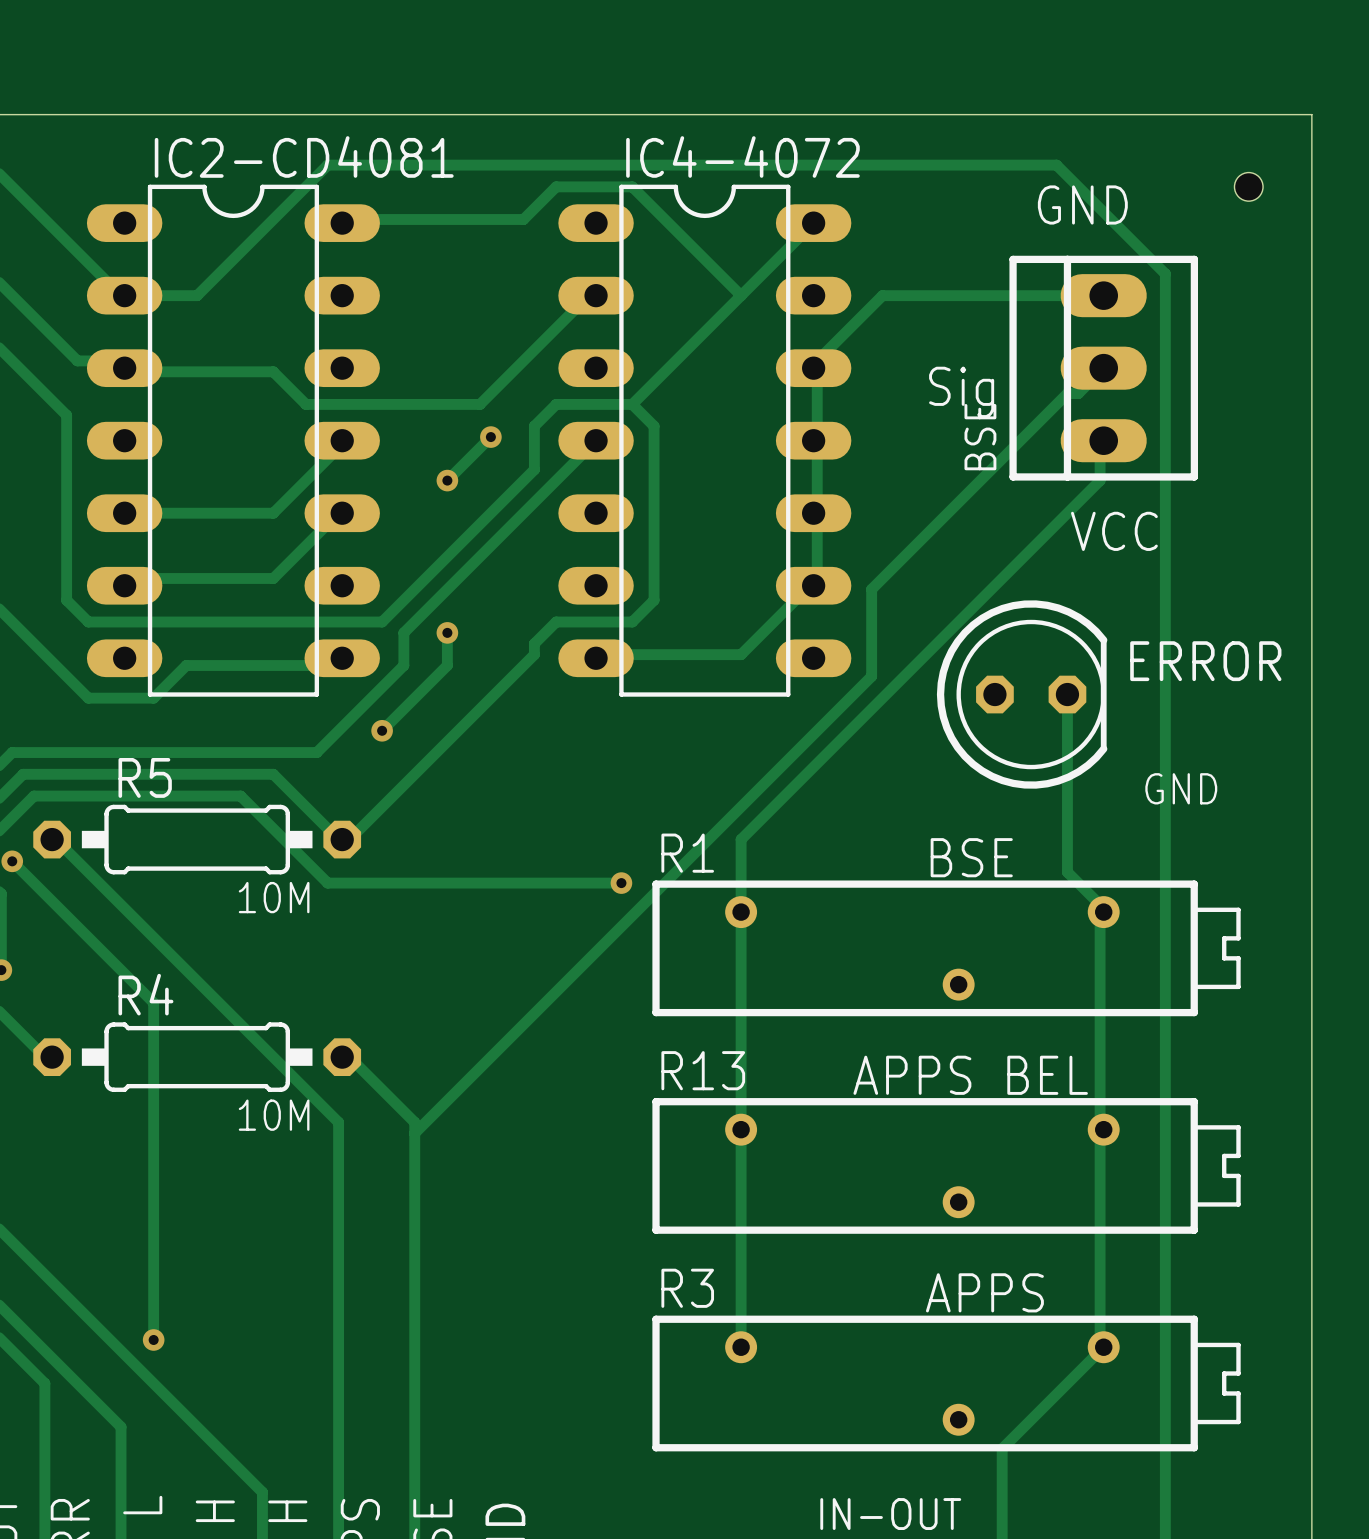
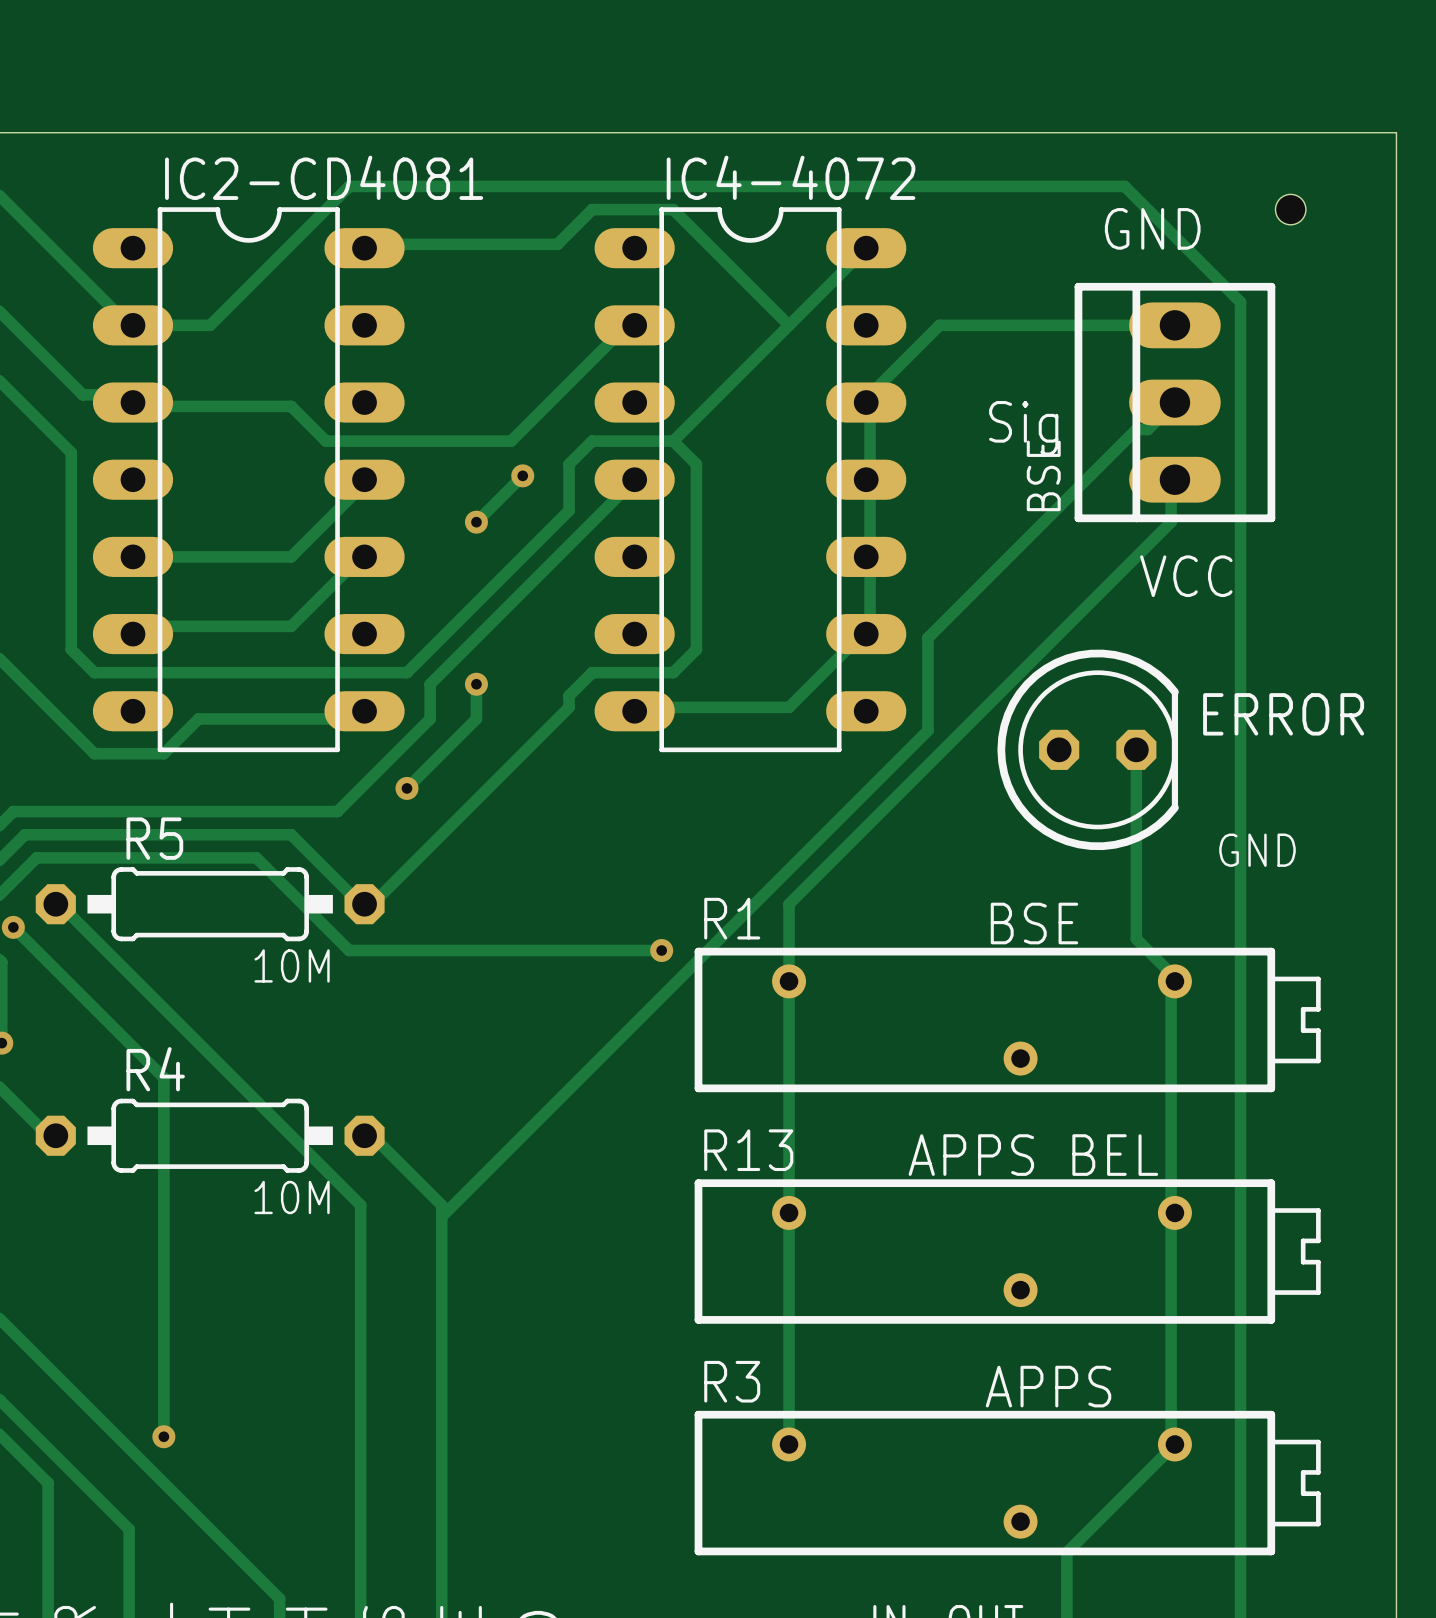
hole position: (1248, 186) -> (1290, 209)

